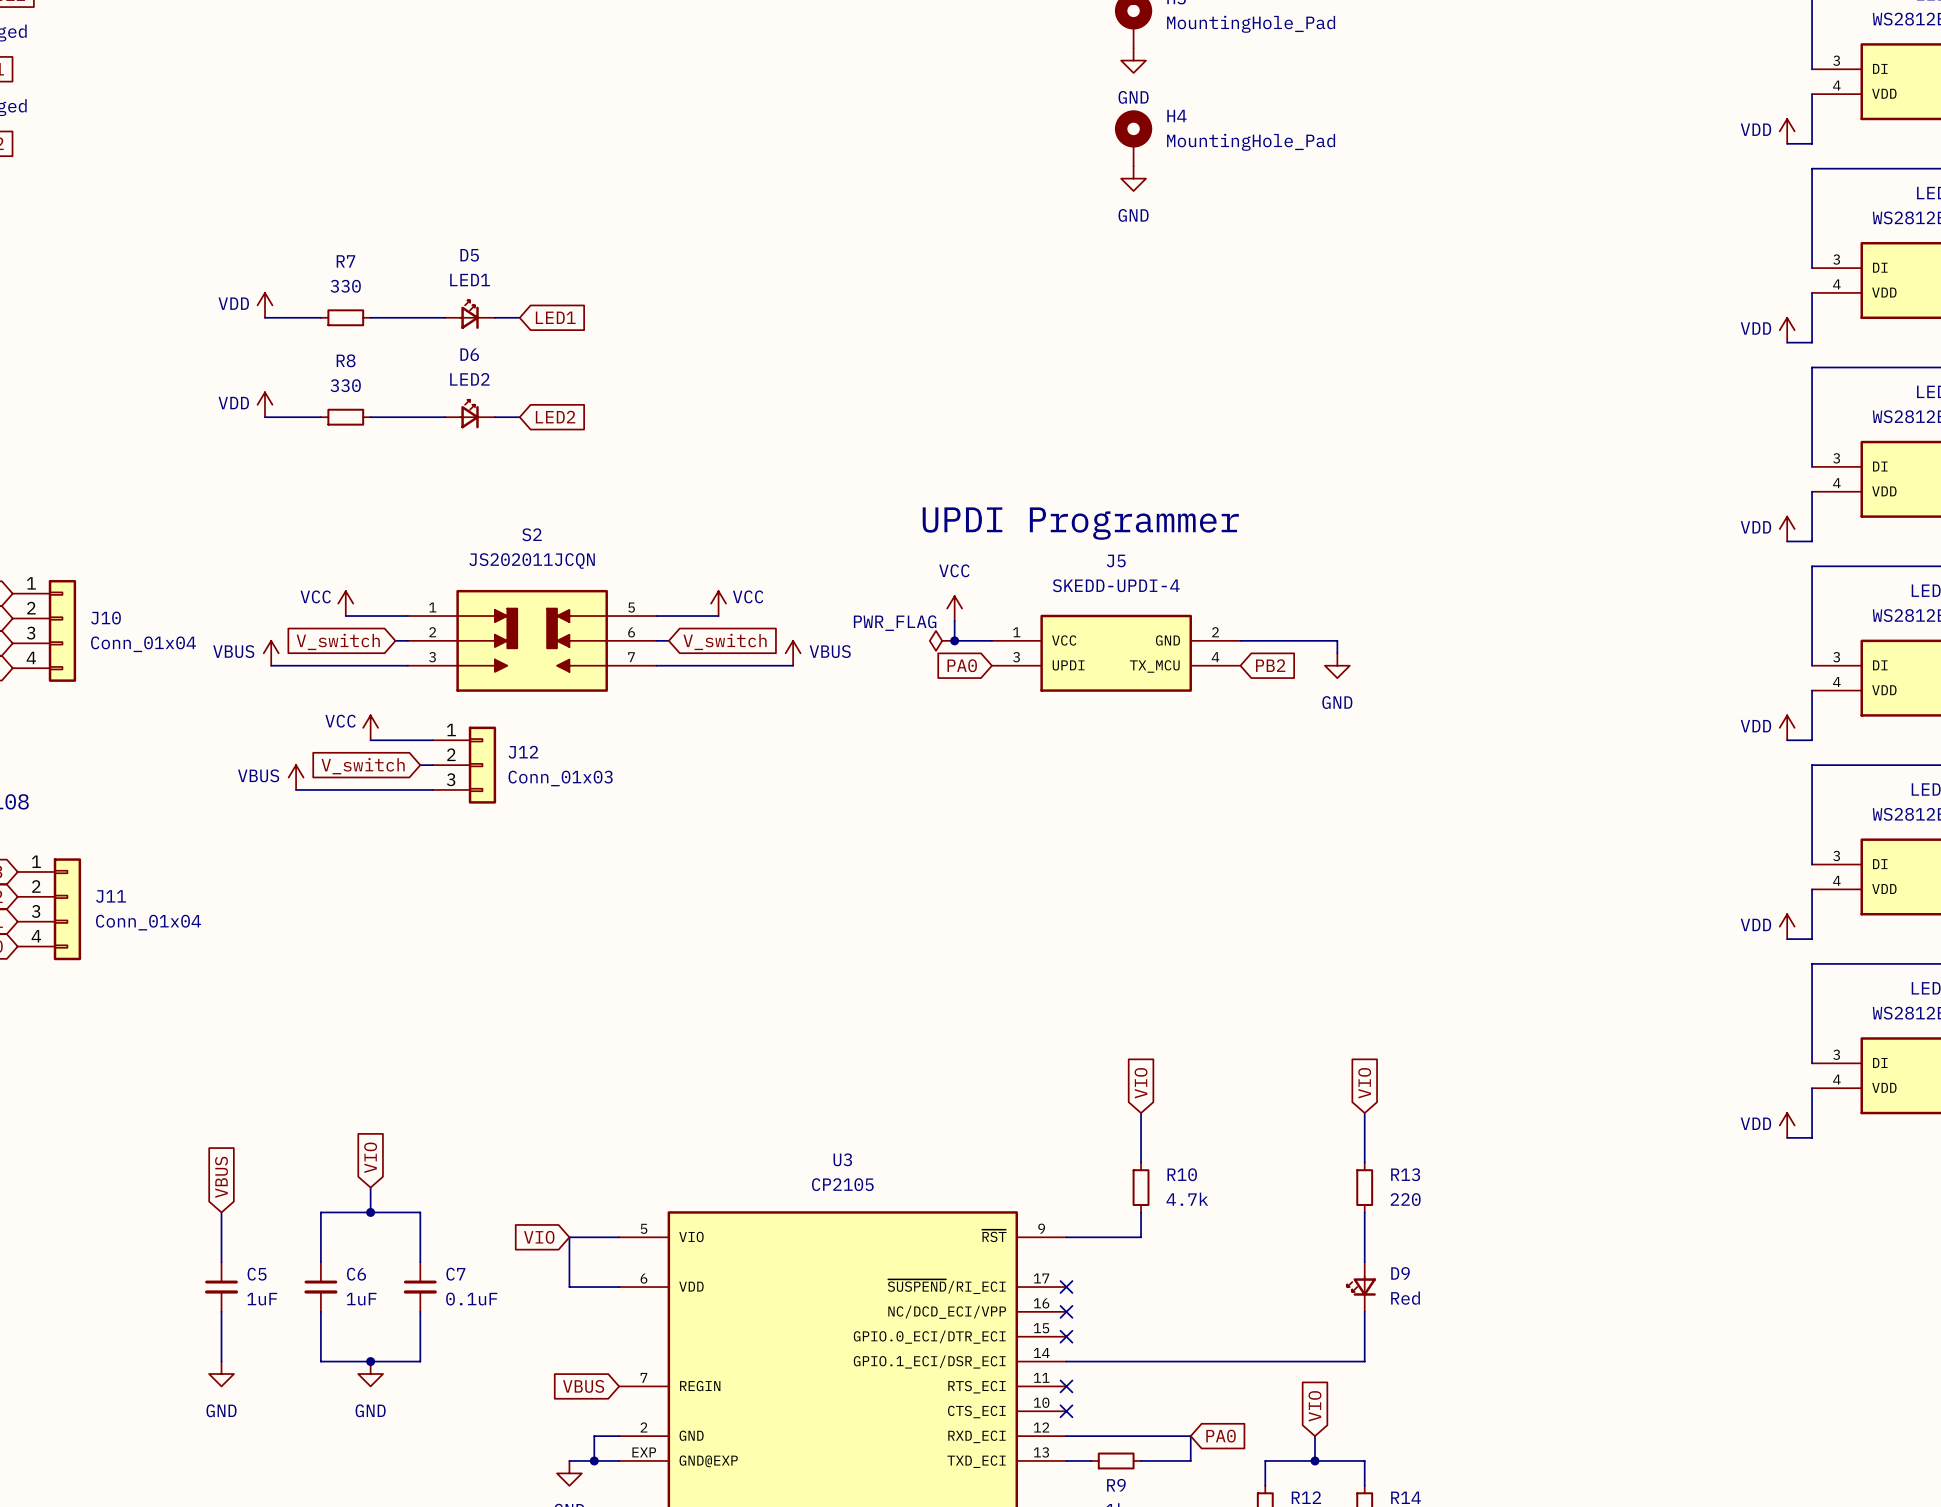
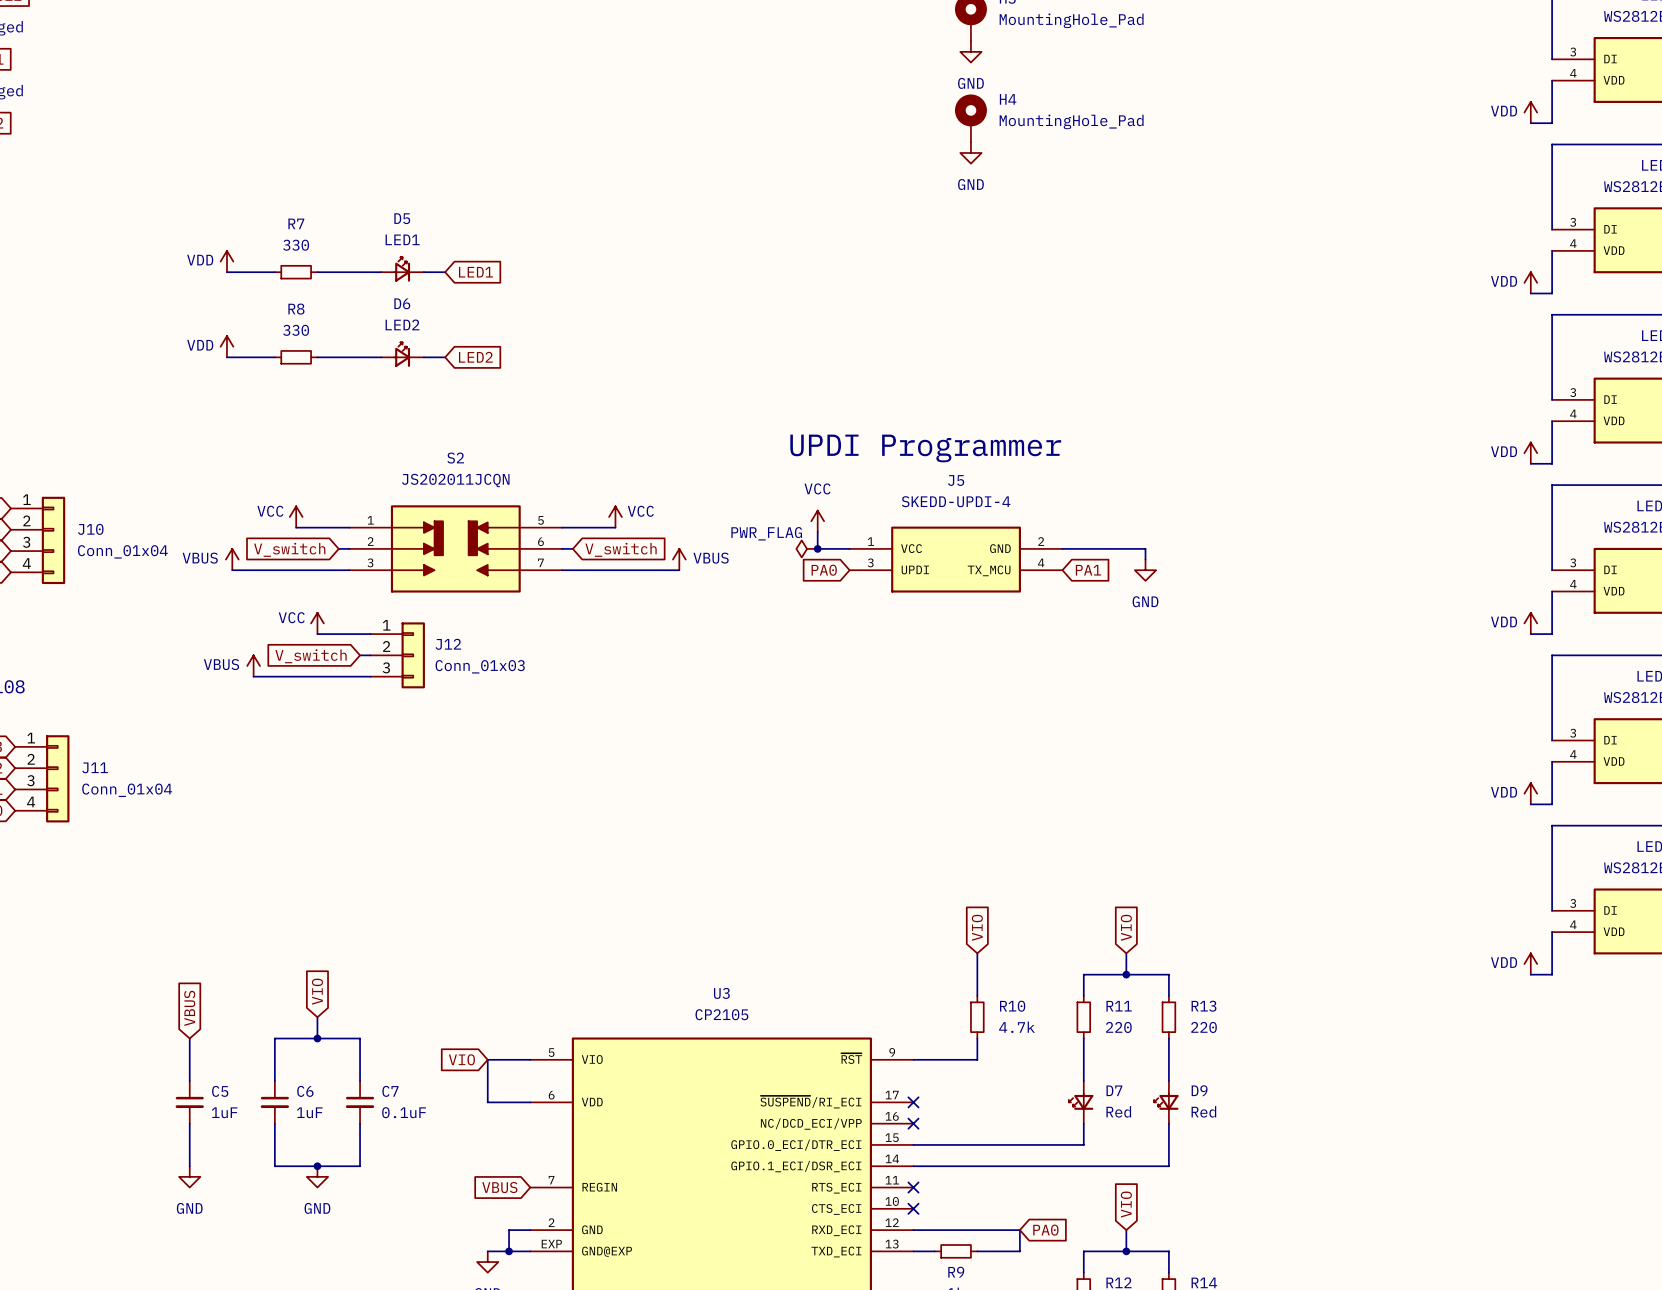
global label: PB2 (1270, 665) -> PA1 (1088, 570)
global label position: VIO (1364, 1083) -> VIO (1126, 927)
wire: none -> (1126, 953) (1126, 974)
wire: (1364, 1113) (1364, 1137) -> (1083, 995) (1083, 974) (1168, 974)
junction: none -> (1126, 974)
R11: none -> 220 (1083, 1017)
wire: none -> (1083, 1038) (1083, 1081)
D7: none -> Red (1081, 1102)
wire: none -> (1083, 1123) (1083, 1144) (913, 1144)
no-connect mark: (1066, 1336) -> none

